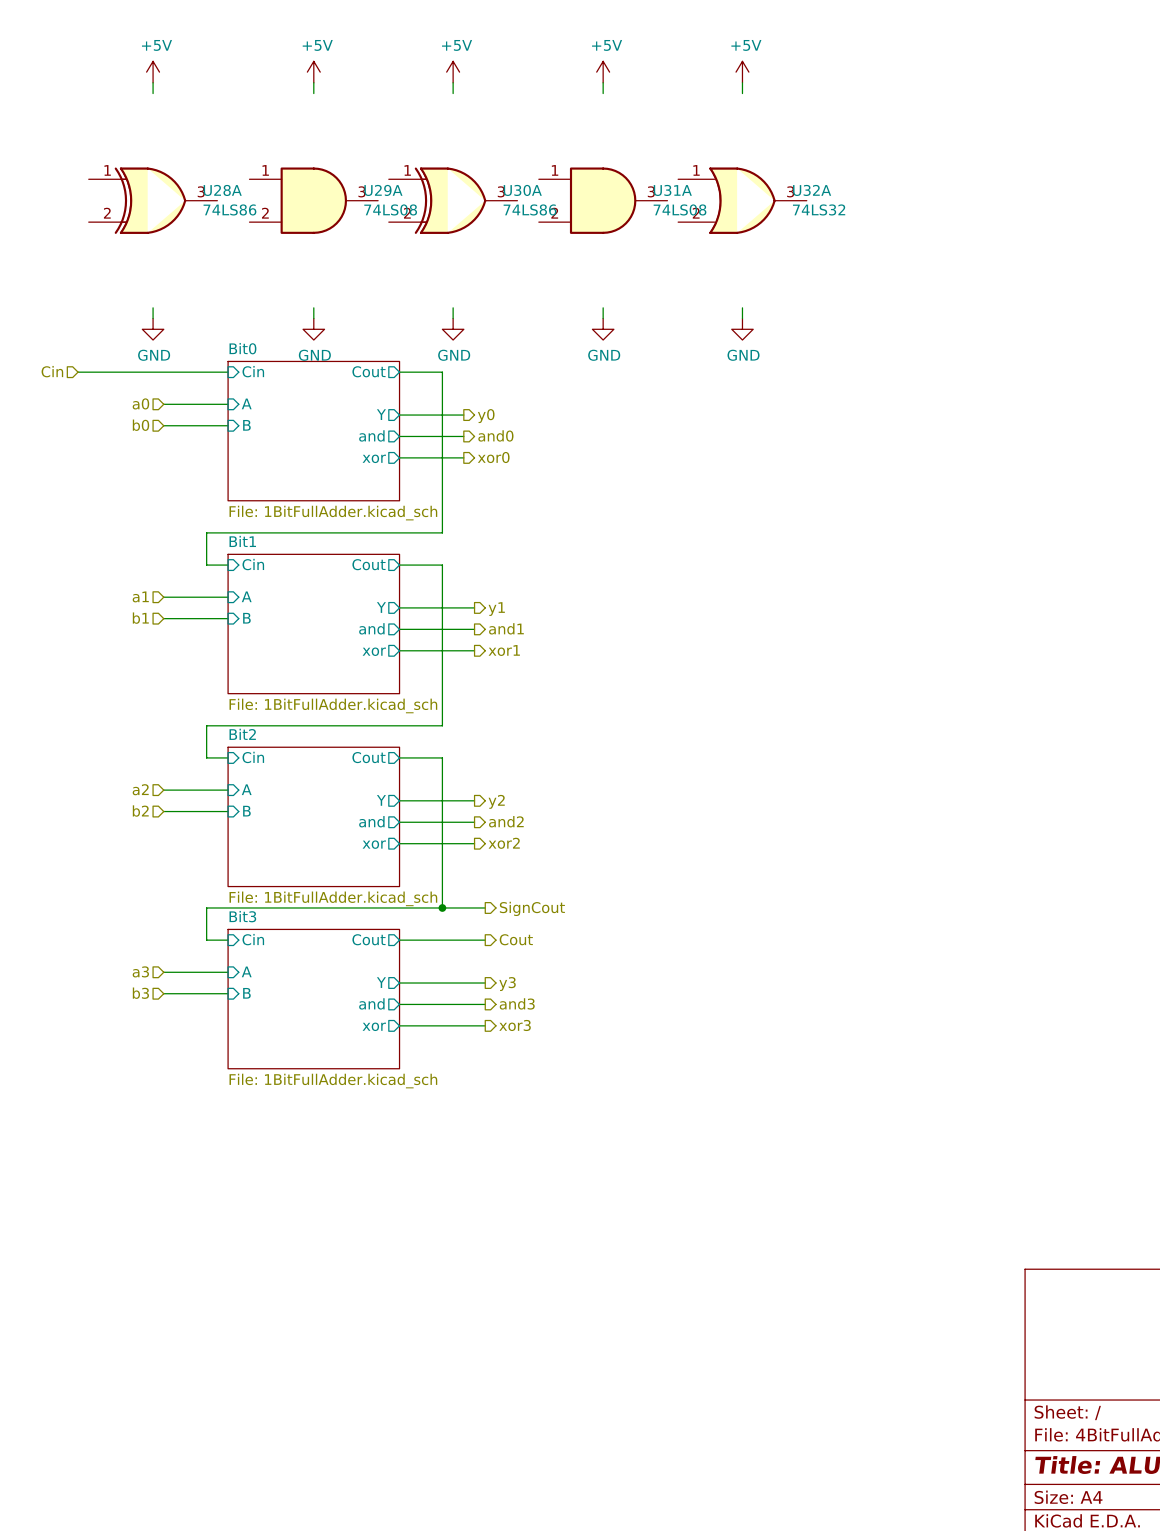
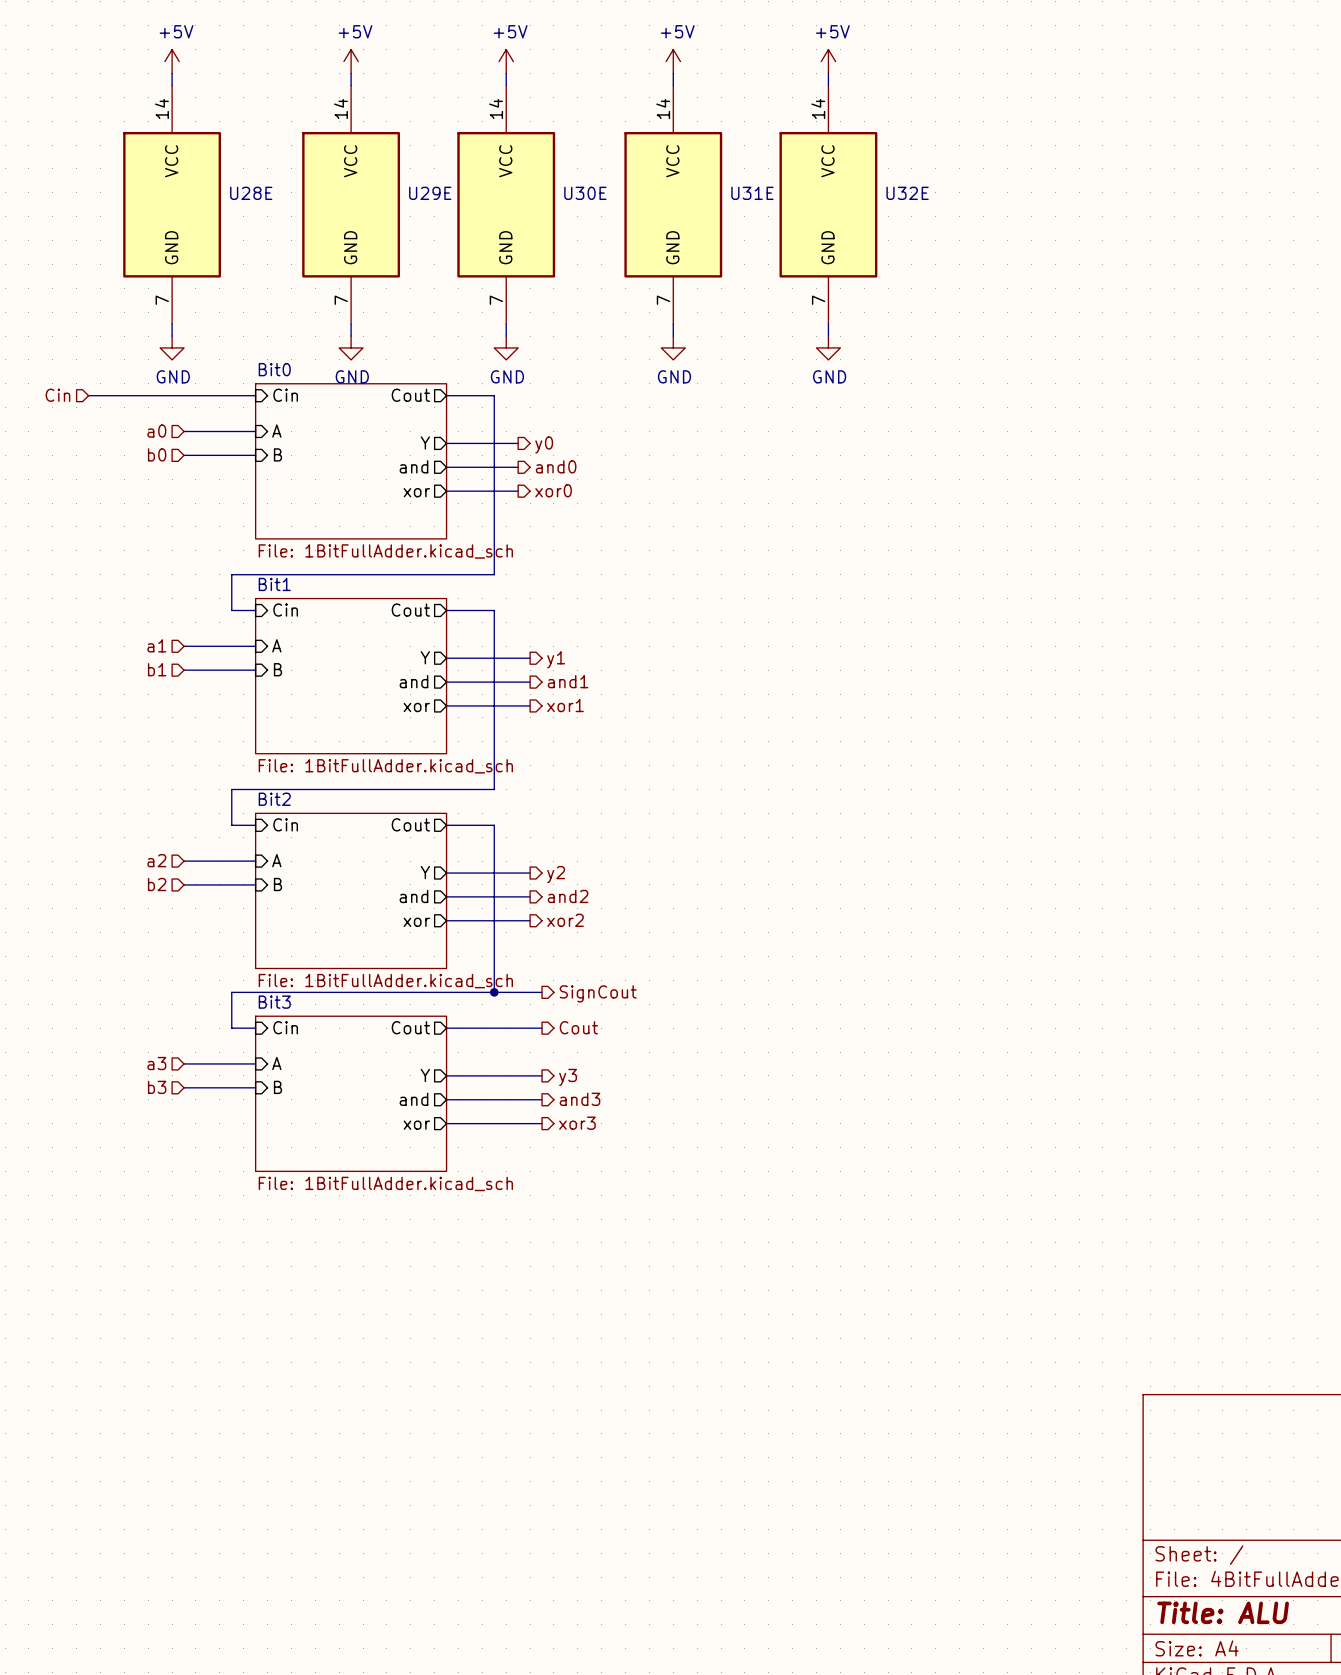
U28A: 74LS86 (153, 200) -> none
U28E: none -> (172, 204)
U29A: 74LS08 (313, 200) -> none
U29E: none -> (351, 204)
U30A: 74LS86 (453, 200) -> none
U30E: none -> (506, 204)
U31A: 74LS08 (603, 200) -> none
U31E: none -> (673, 204)
U32A: 74LS32 (742, 200) -> none
U32E: none -> (828, 204)

